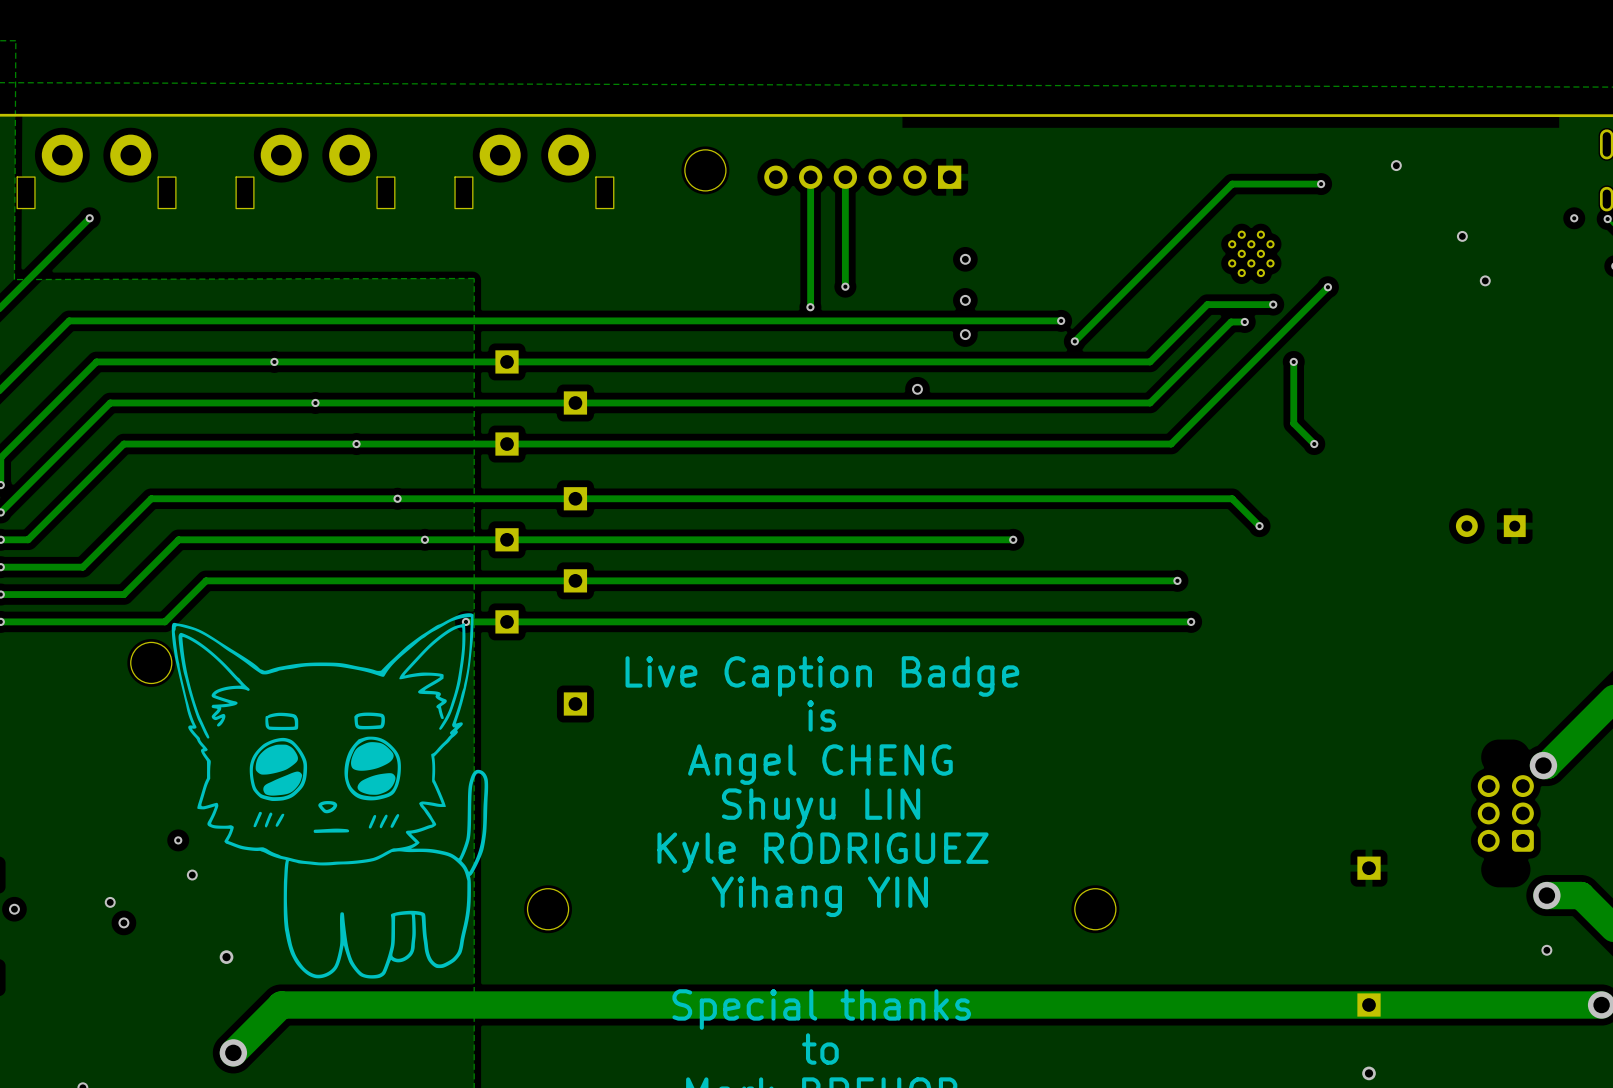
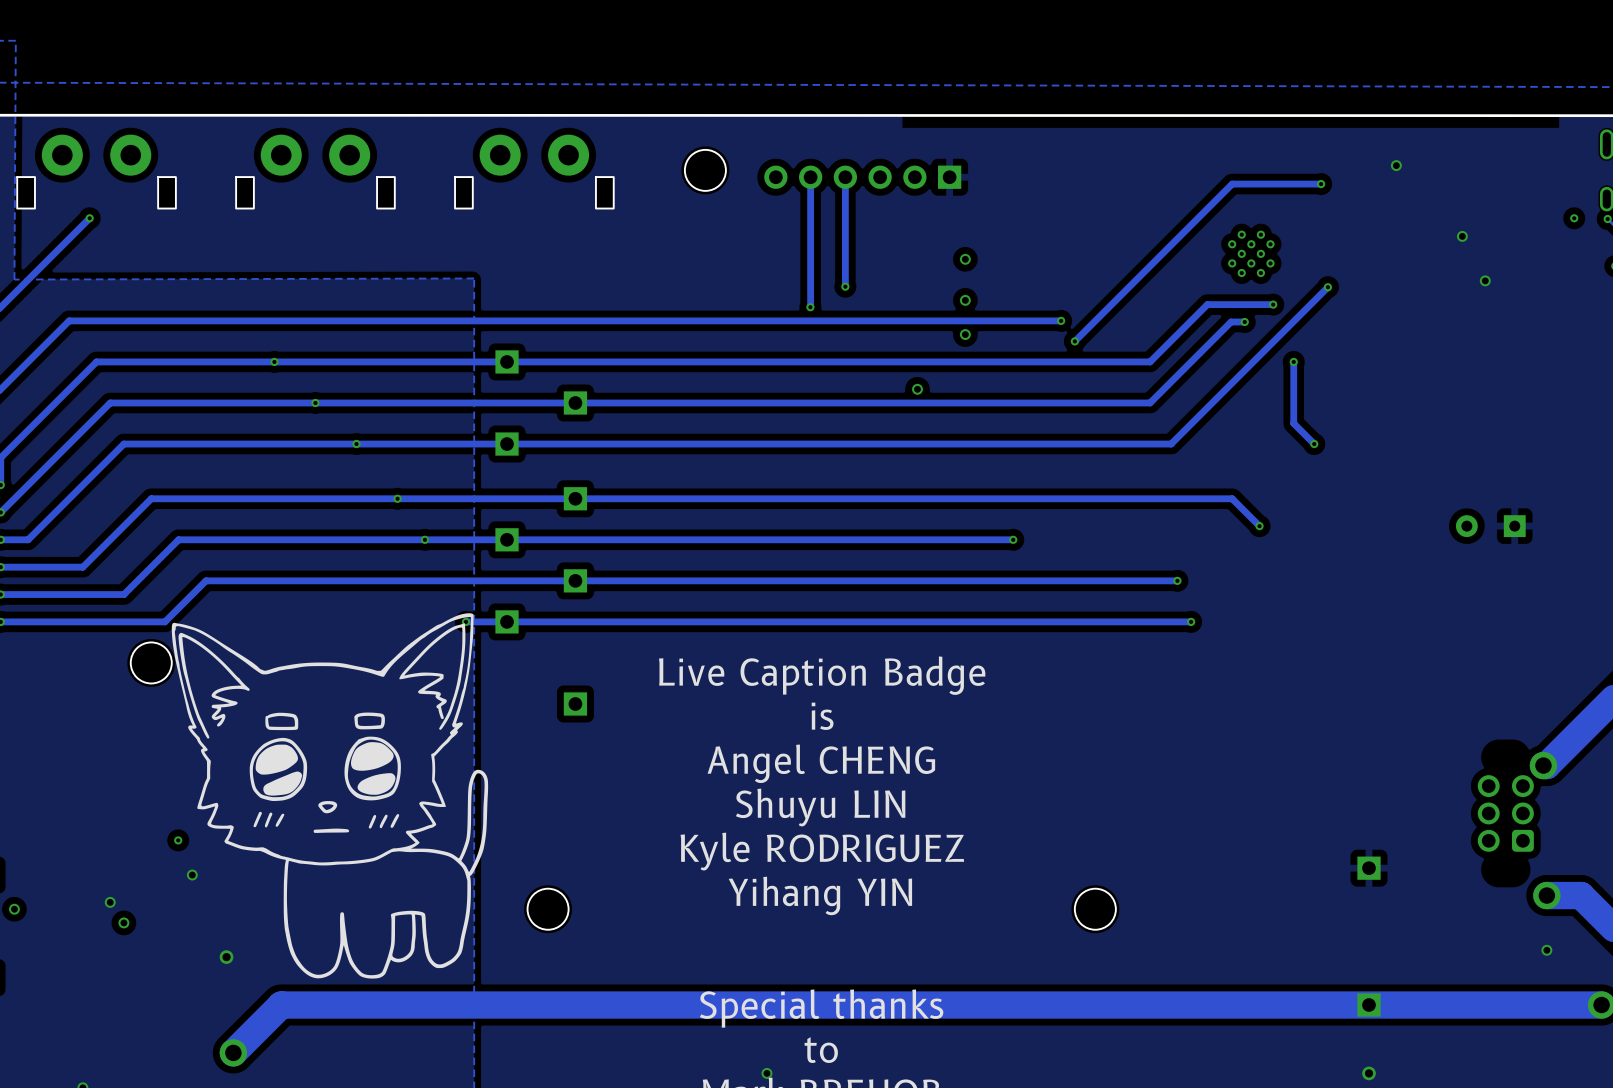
via: none -> (766, 1073)

